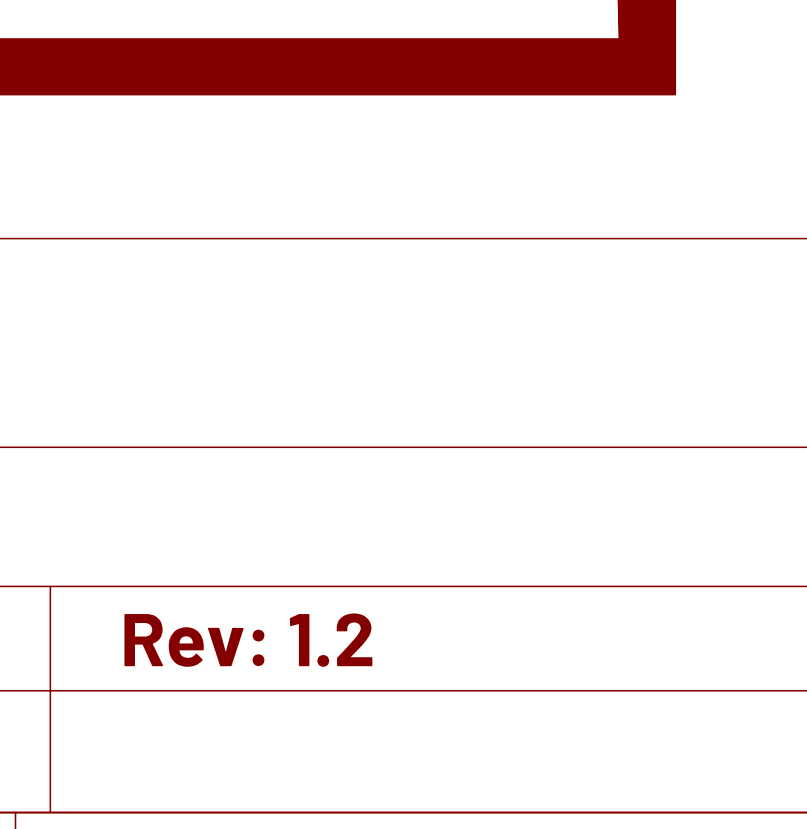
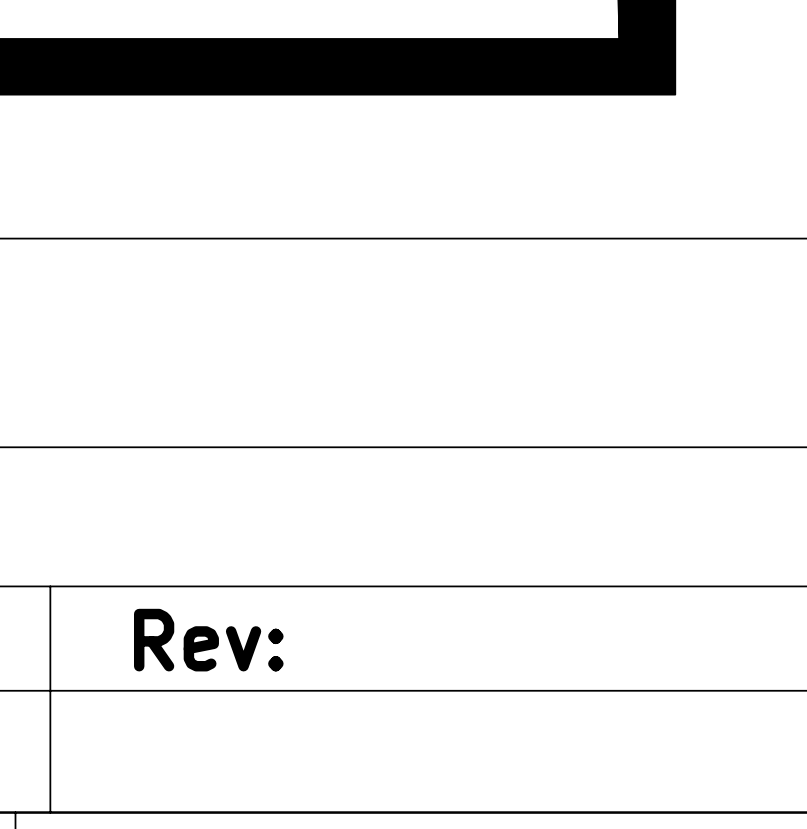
title block: Rev: 1.2 (248, 640) -> Rev: (208, 640)

